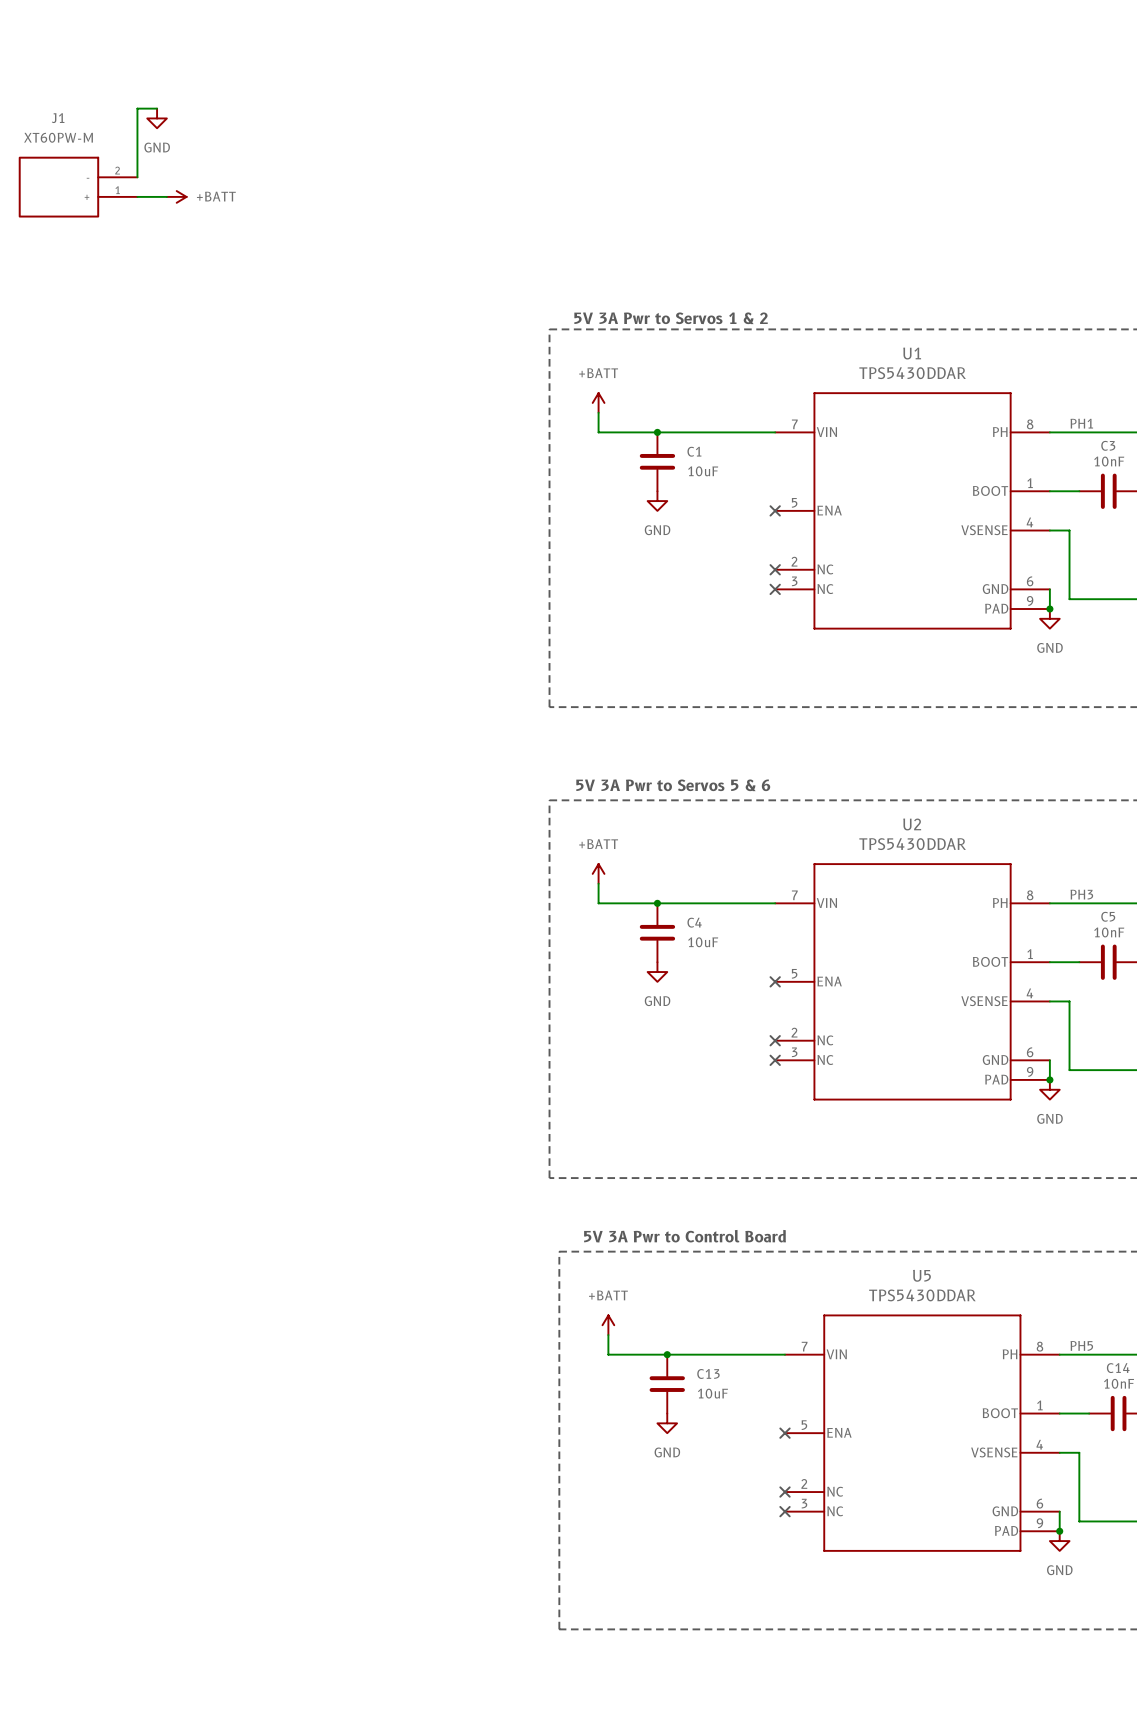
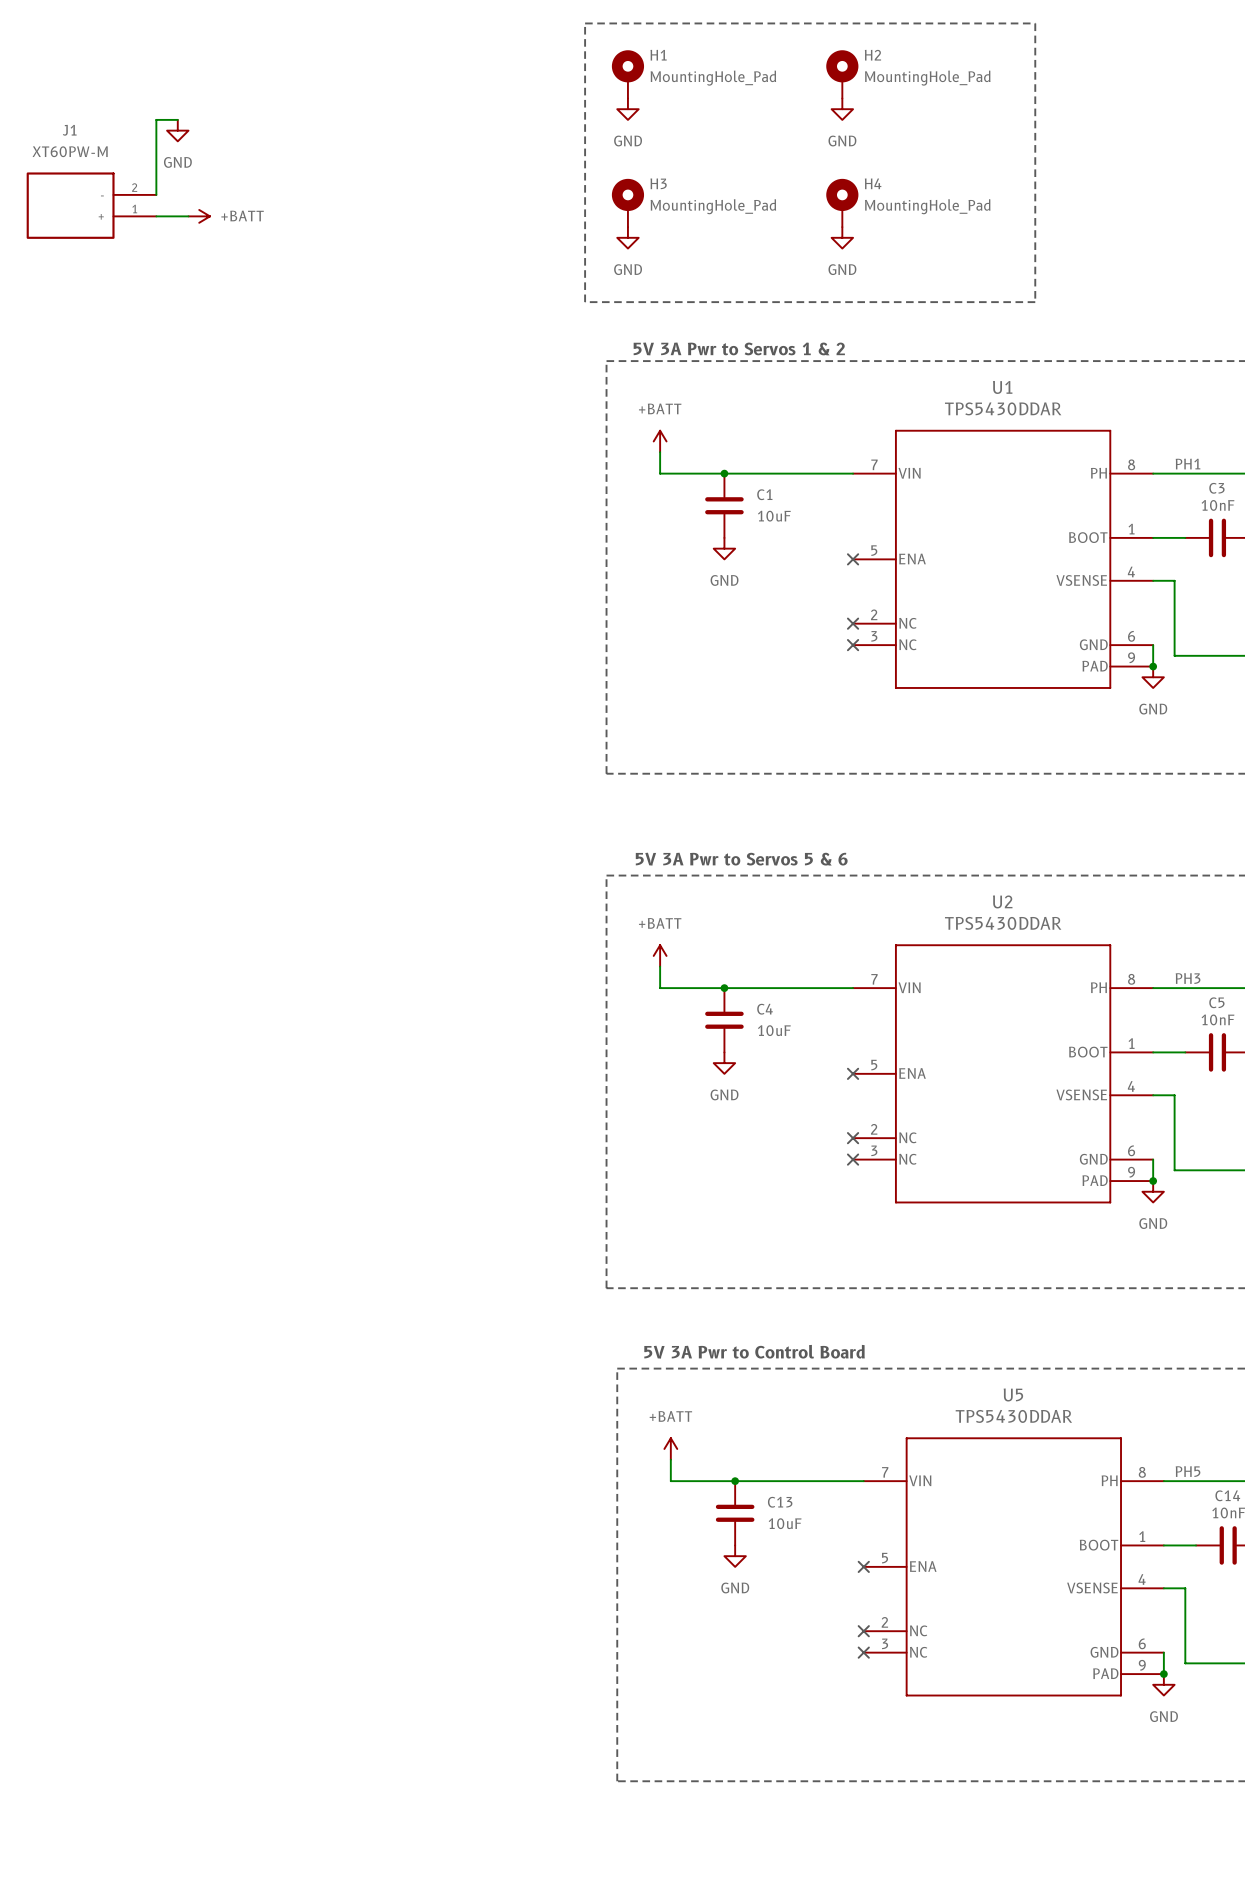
line: none -> (585, 23) (1035, 23) (1035, 302) (585, 302) (585, 23)
H1: none -> MountingHole_Pad (627, 74)
H2: none -> MountingHole_Pad (842, 74)
power symbol: none -> GND (627, 109)
power symbol: none -> GND (842, 109)
H3: none -> MountingHole_Pad (627, 202)
H4: none -> MountingHole_Pad (842, 202)
power symbol: none -> GND (627, 237)
power symbol: none -> GND (842, 237)

